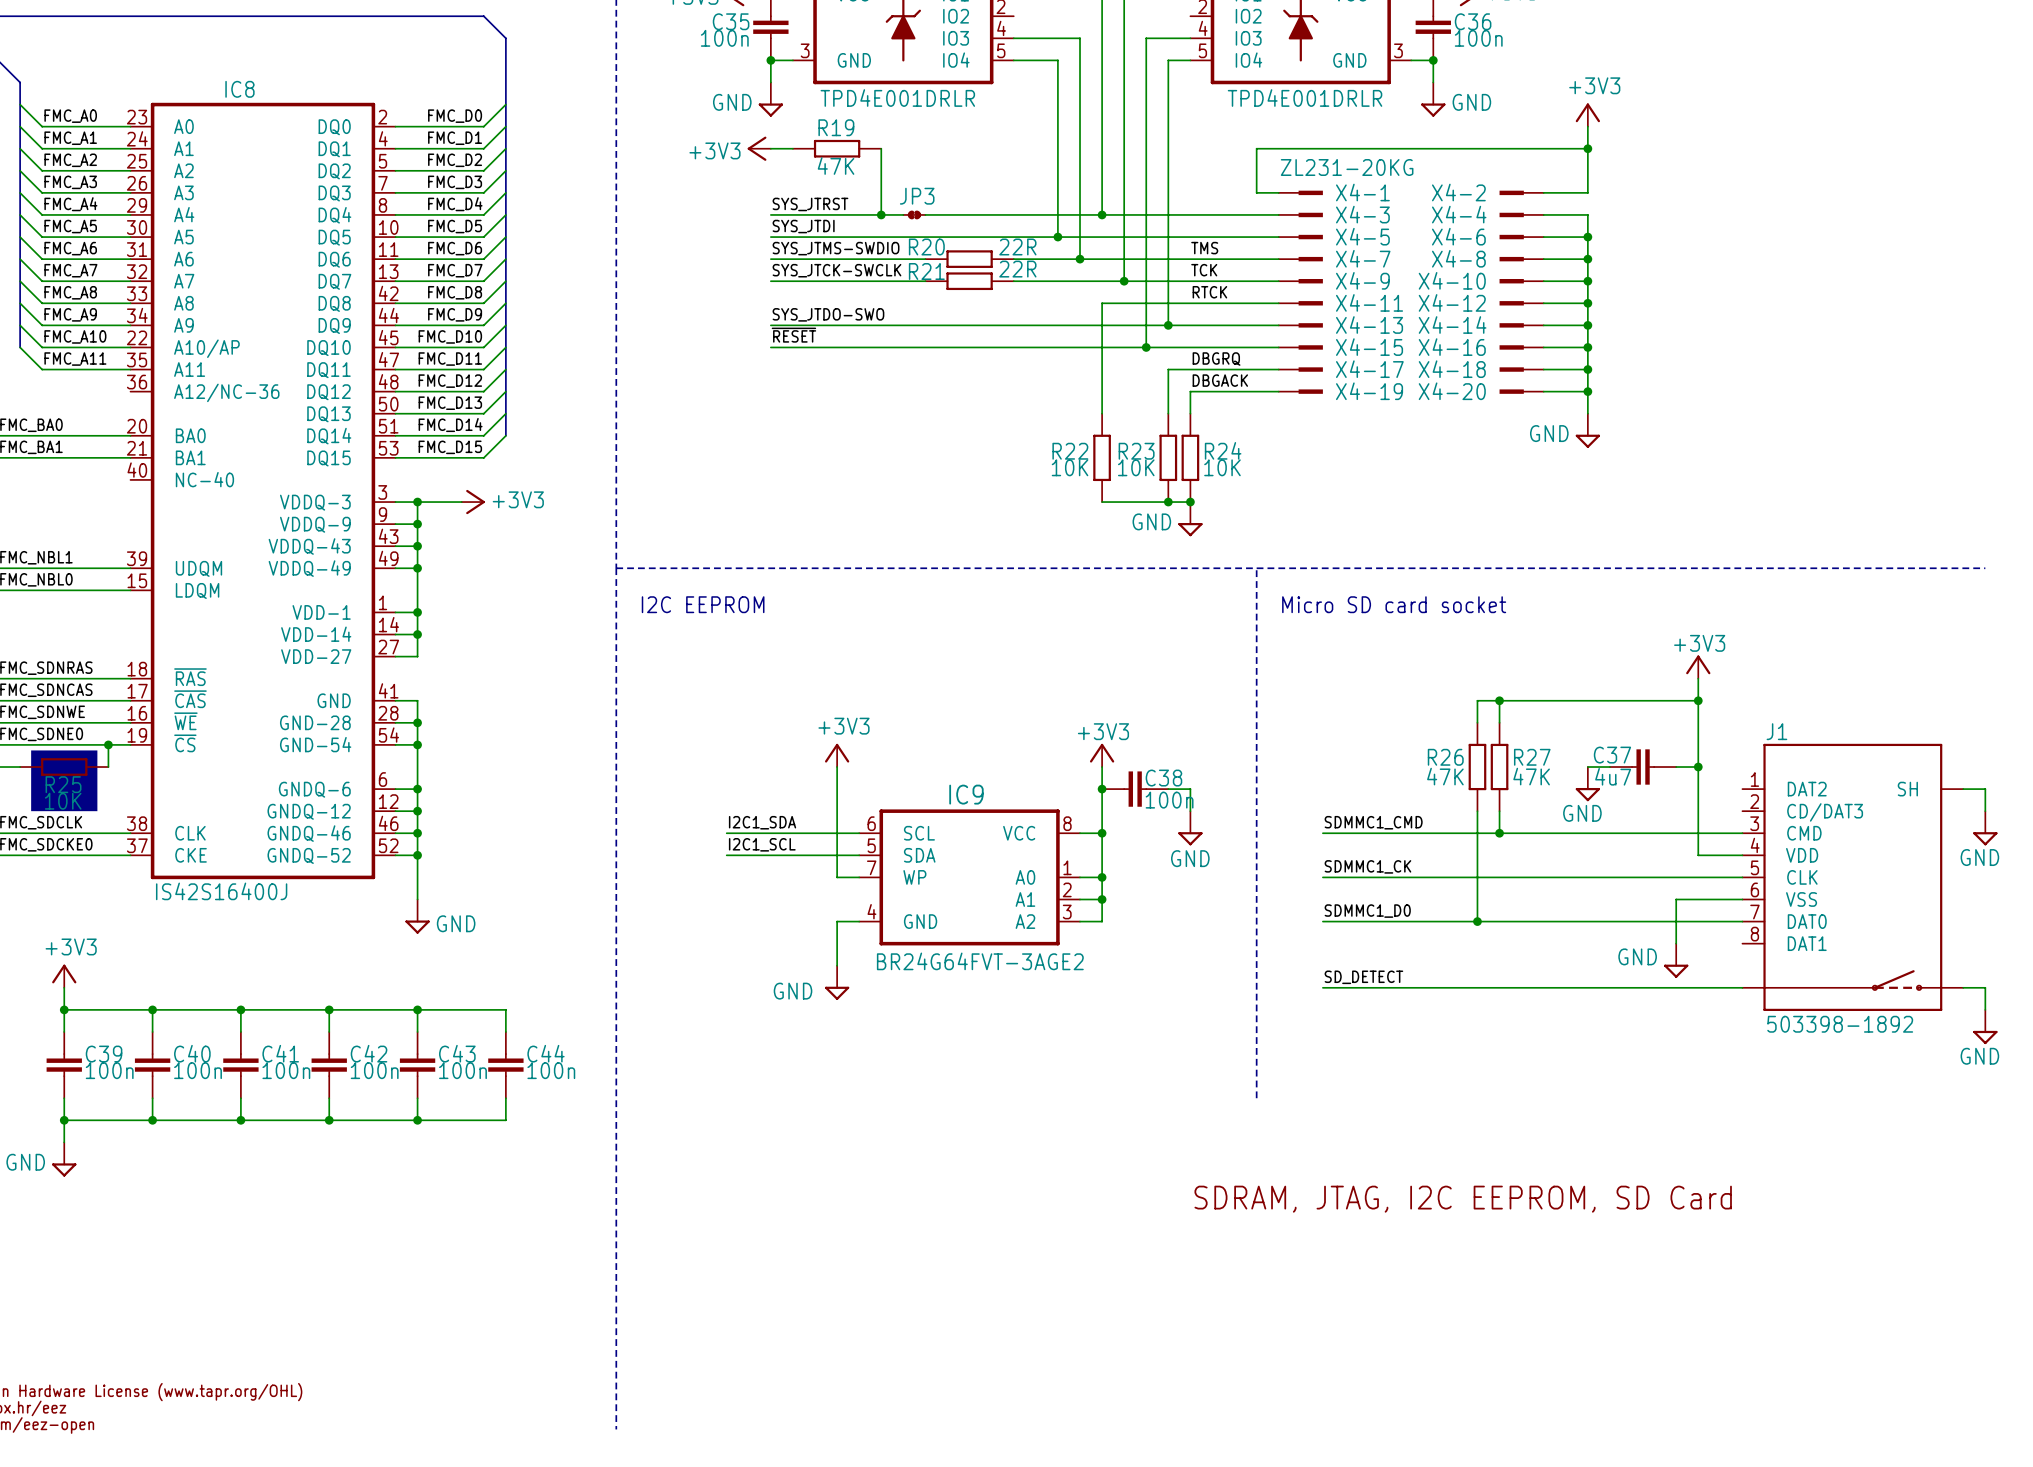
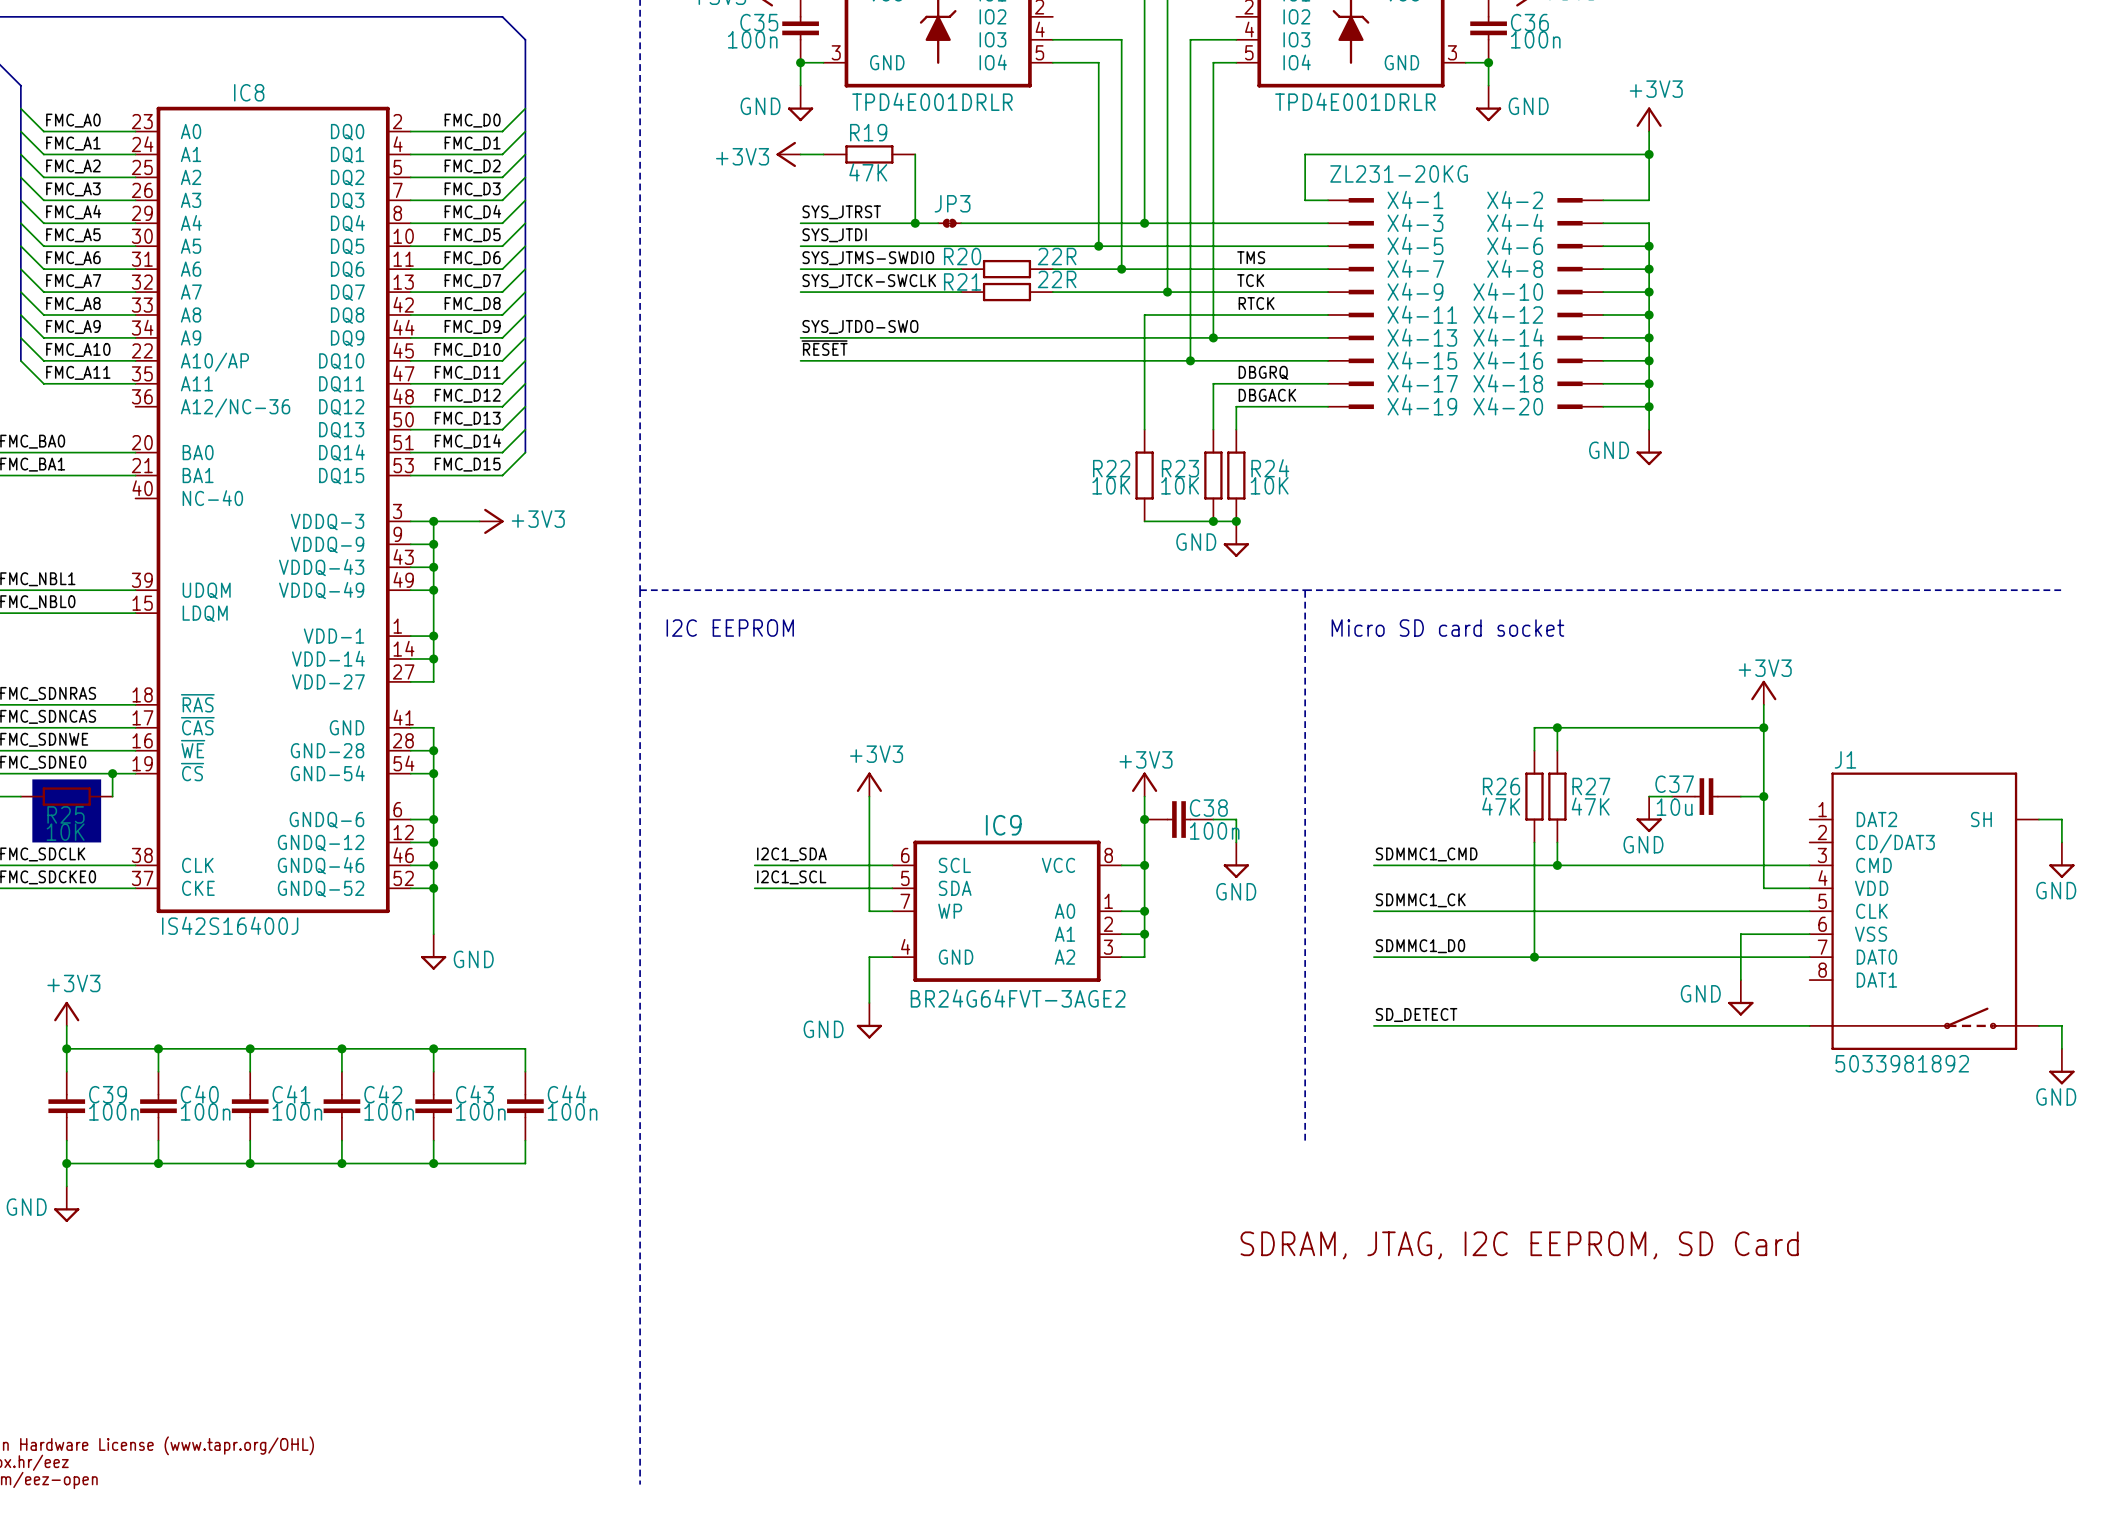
C37 value: 4u7 (1613, 776) -> 10u (1674, 807)
J1 value: 503398-1892 (1840, 1024) -> 5033981892 (1902, 1063)

